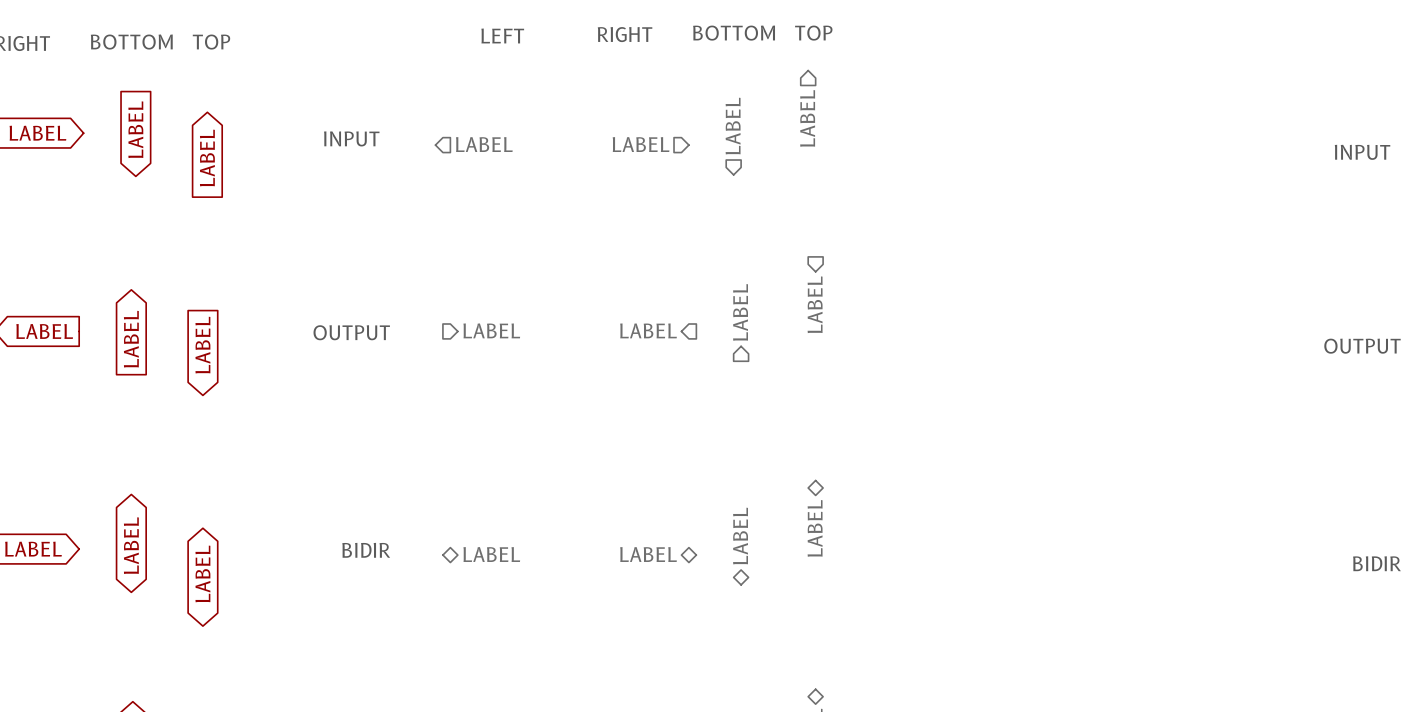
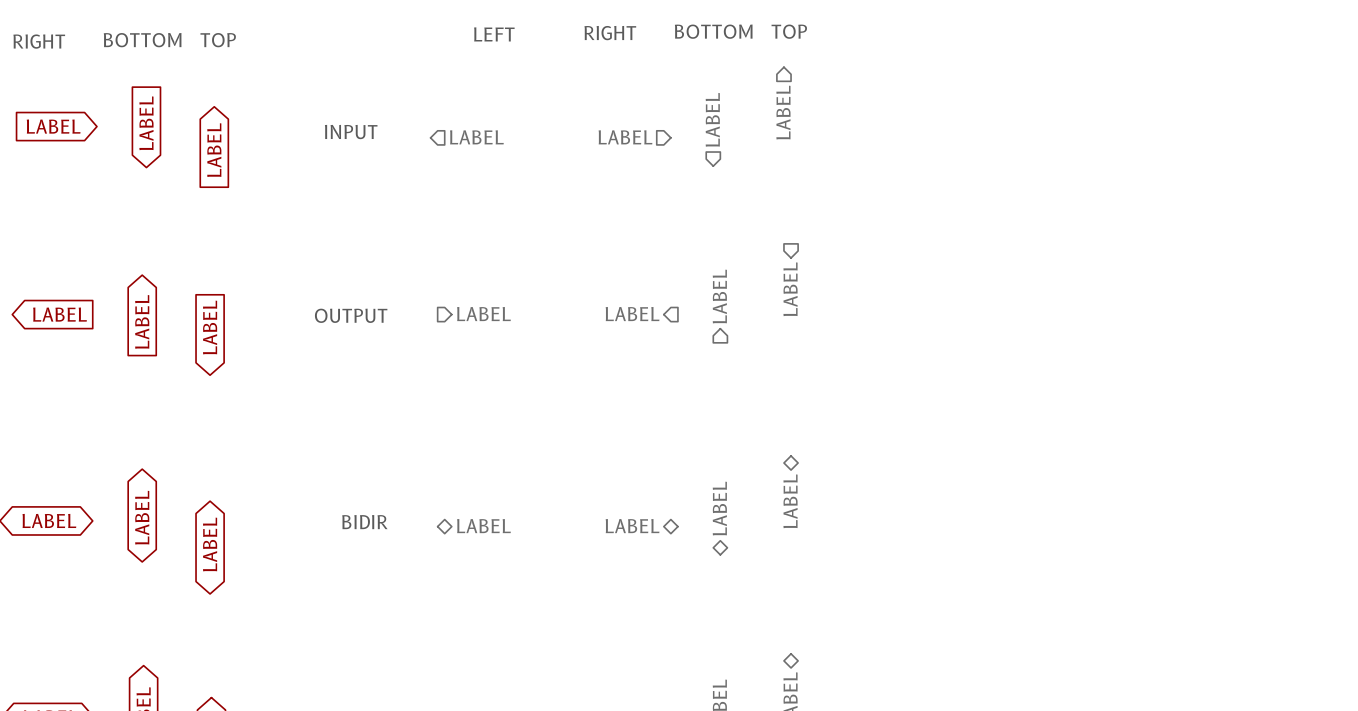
text: INPUT (1362, 152) -> none
text: OUTPUT (1362, 346) -> none
text: BIDIR (1376, 563) -> none

